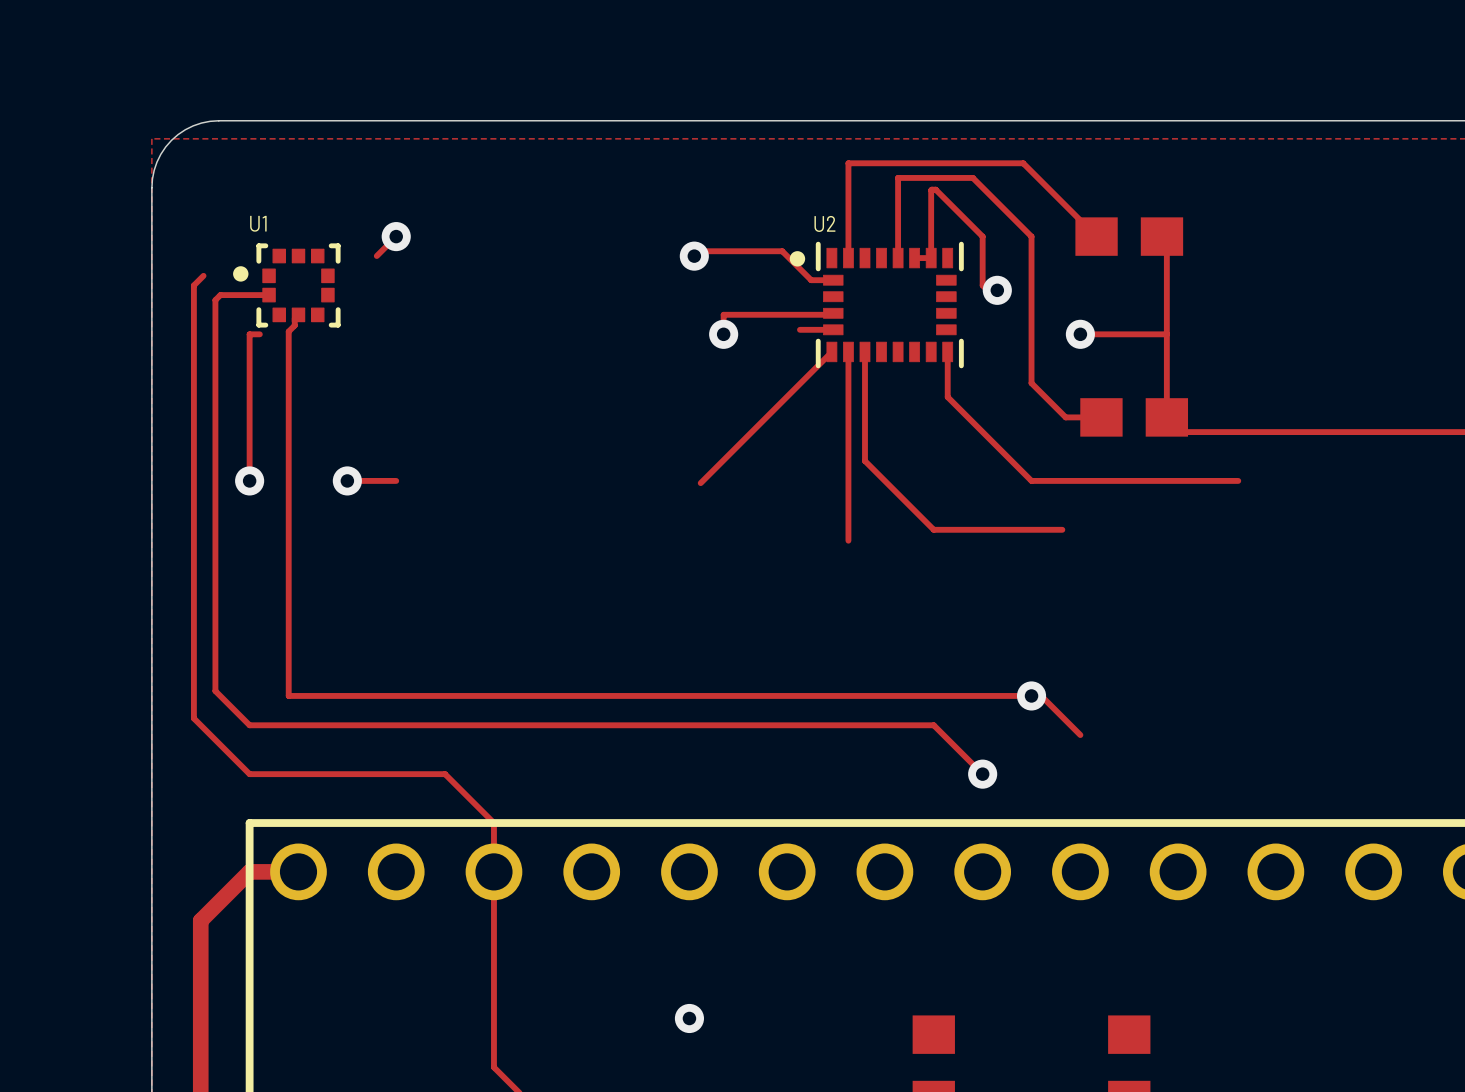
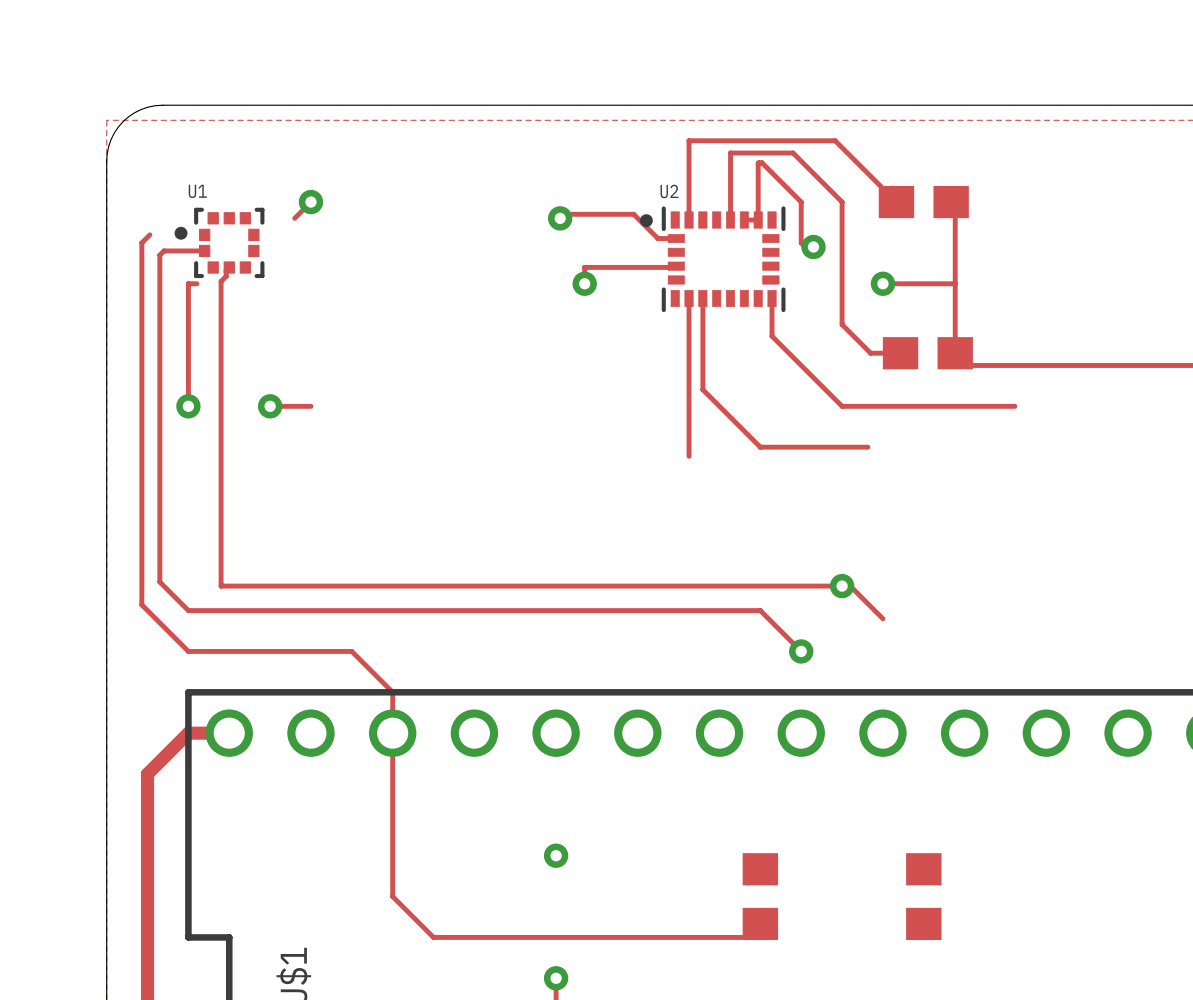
track: (799, 329) (833, 329) -> none
track: (831, 351) (700, 483) -> none

